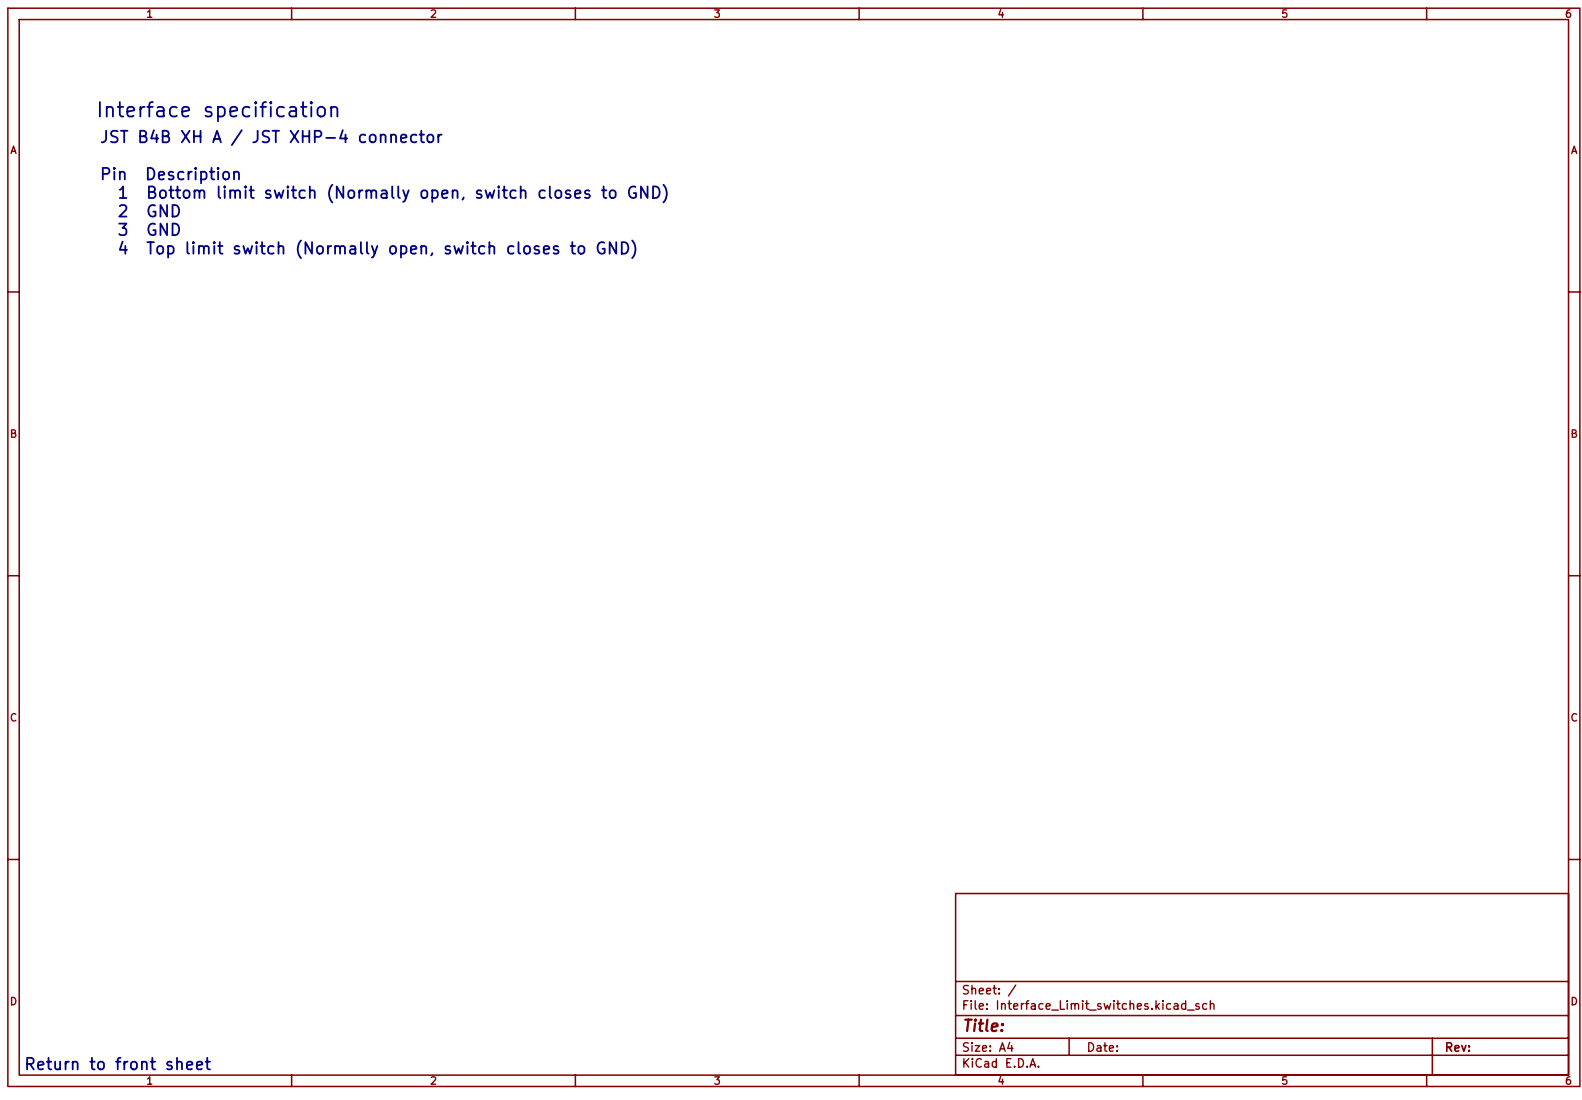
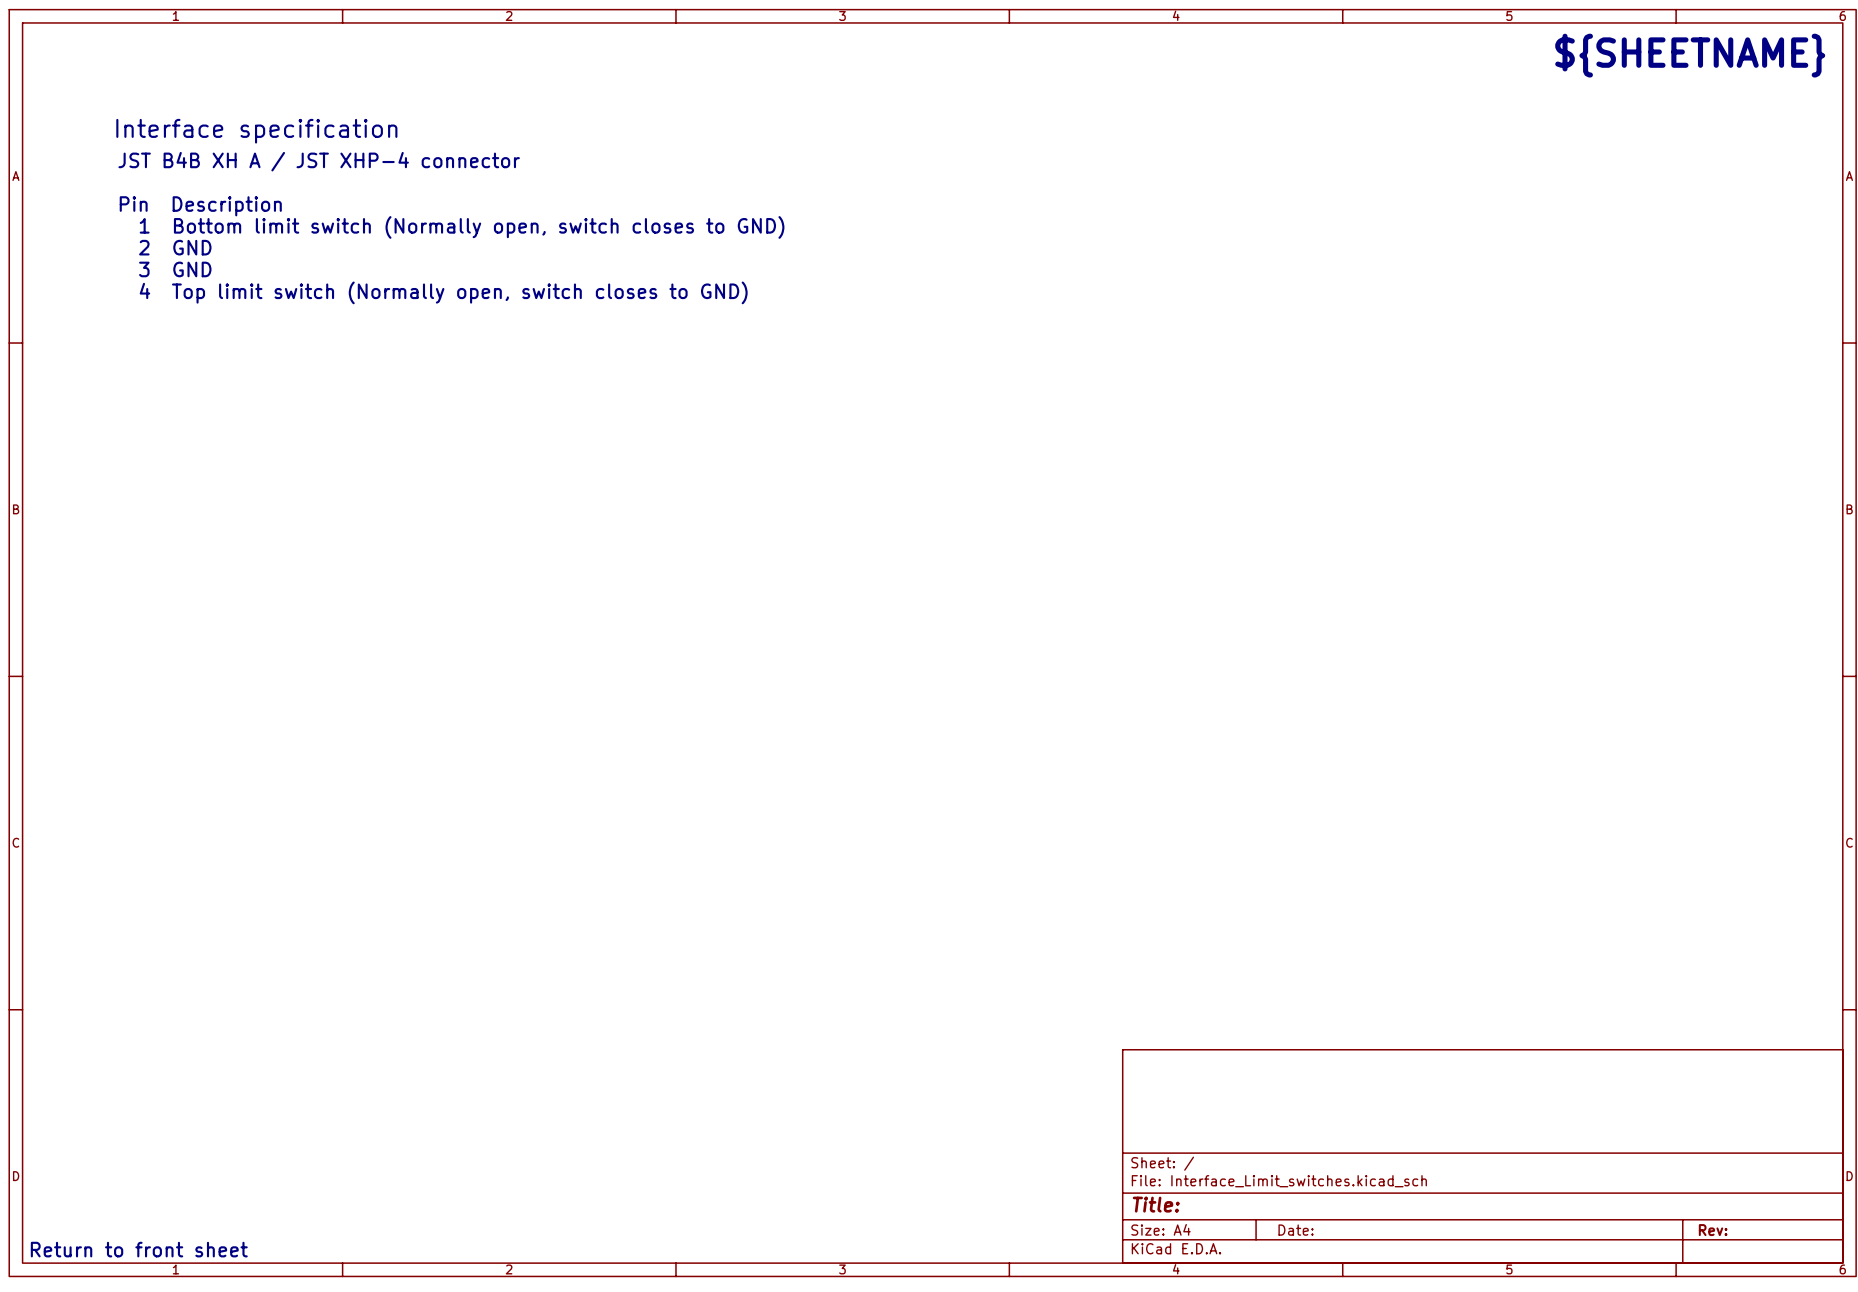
text: none -> ${SHEETNAME} (1690, 55)

